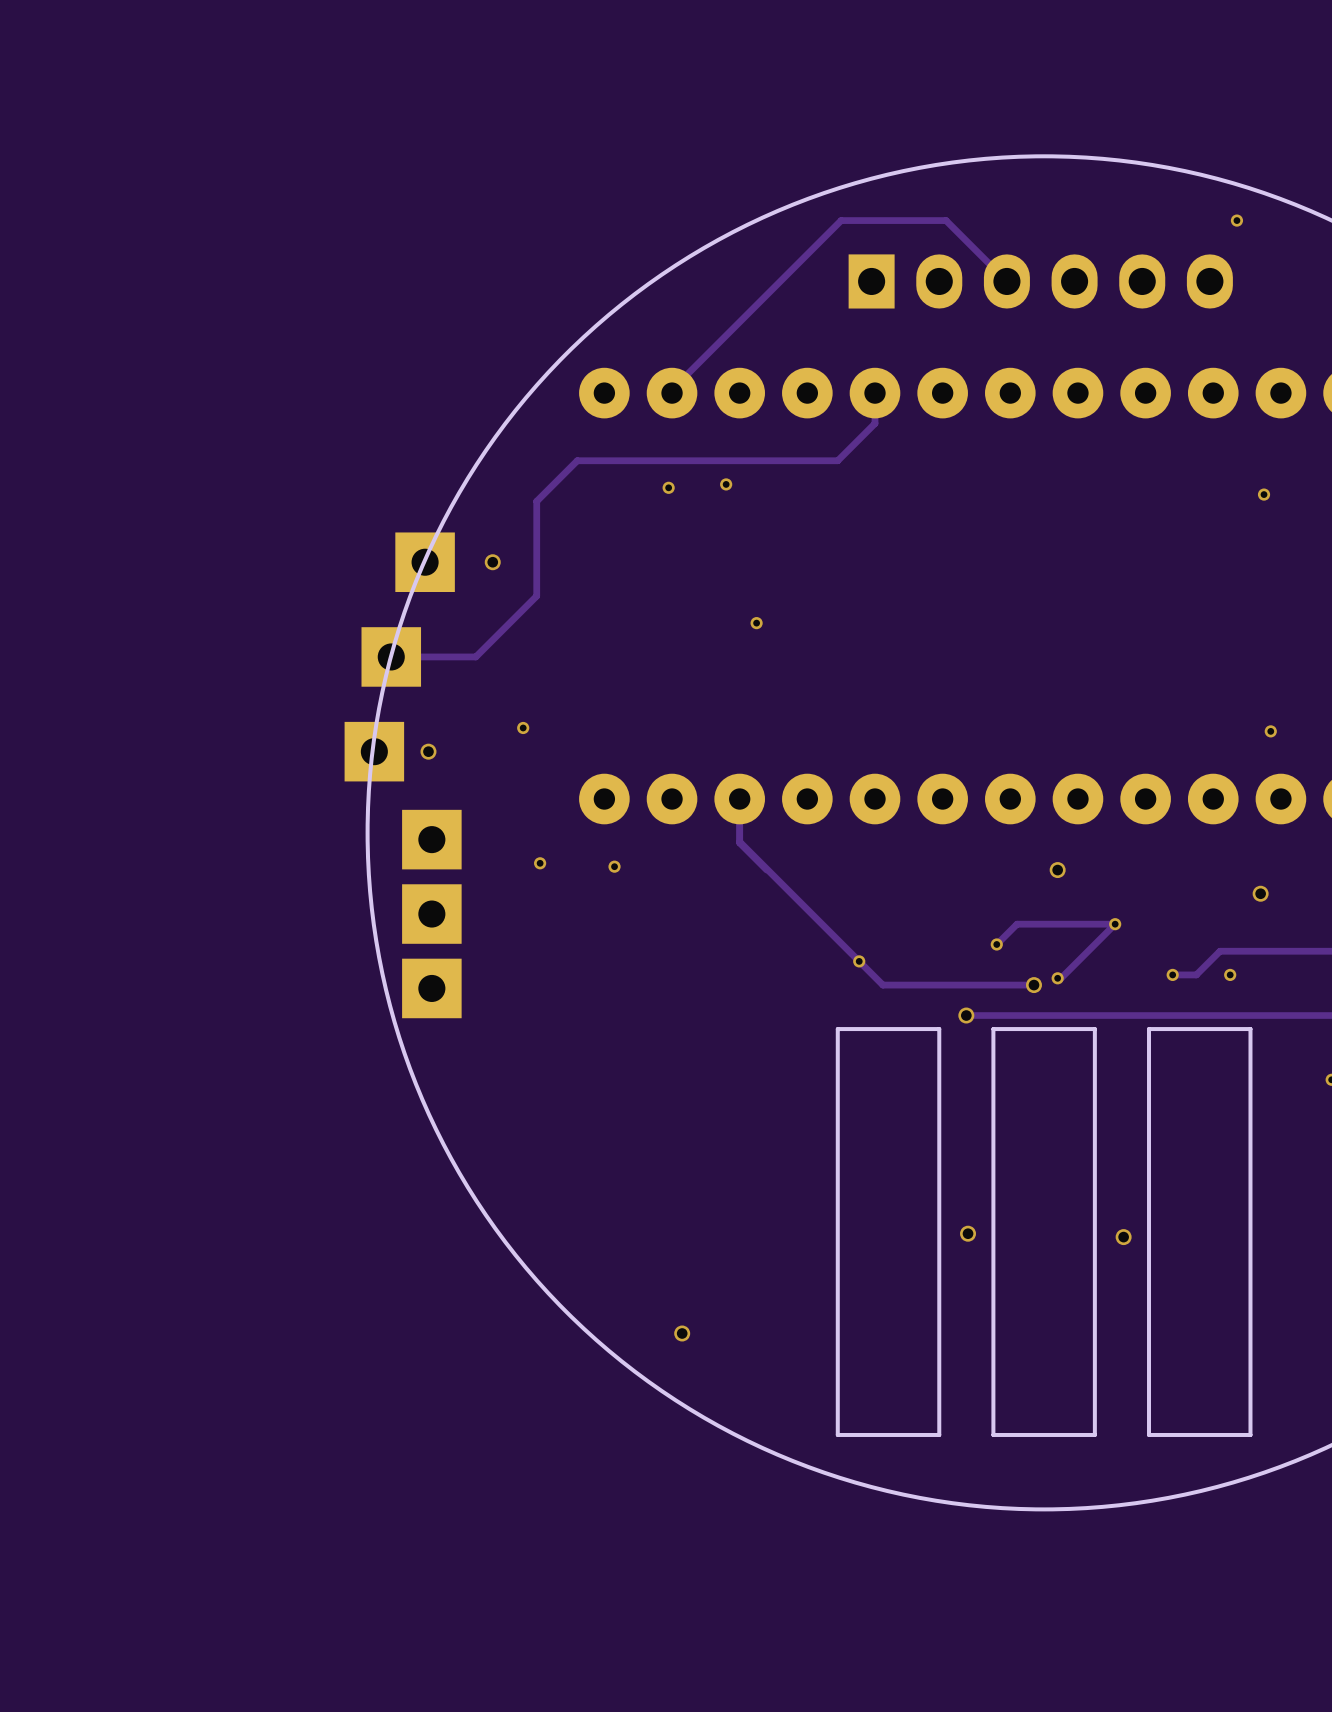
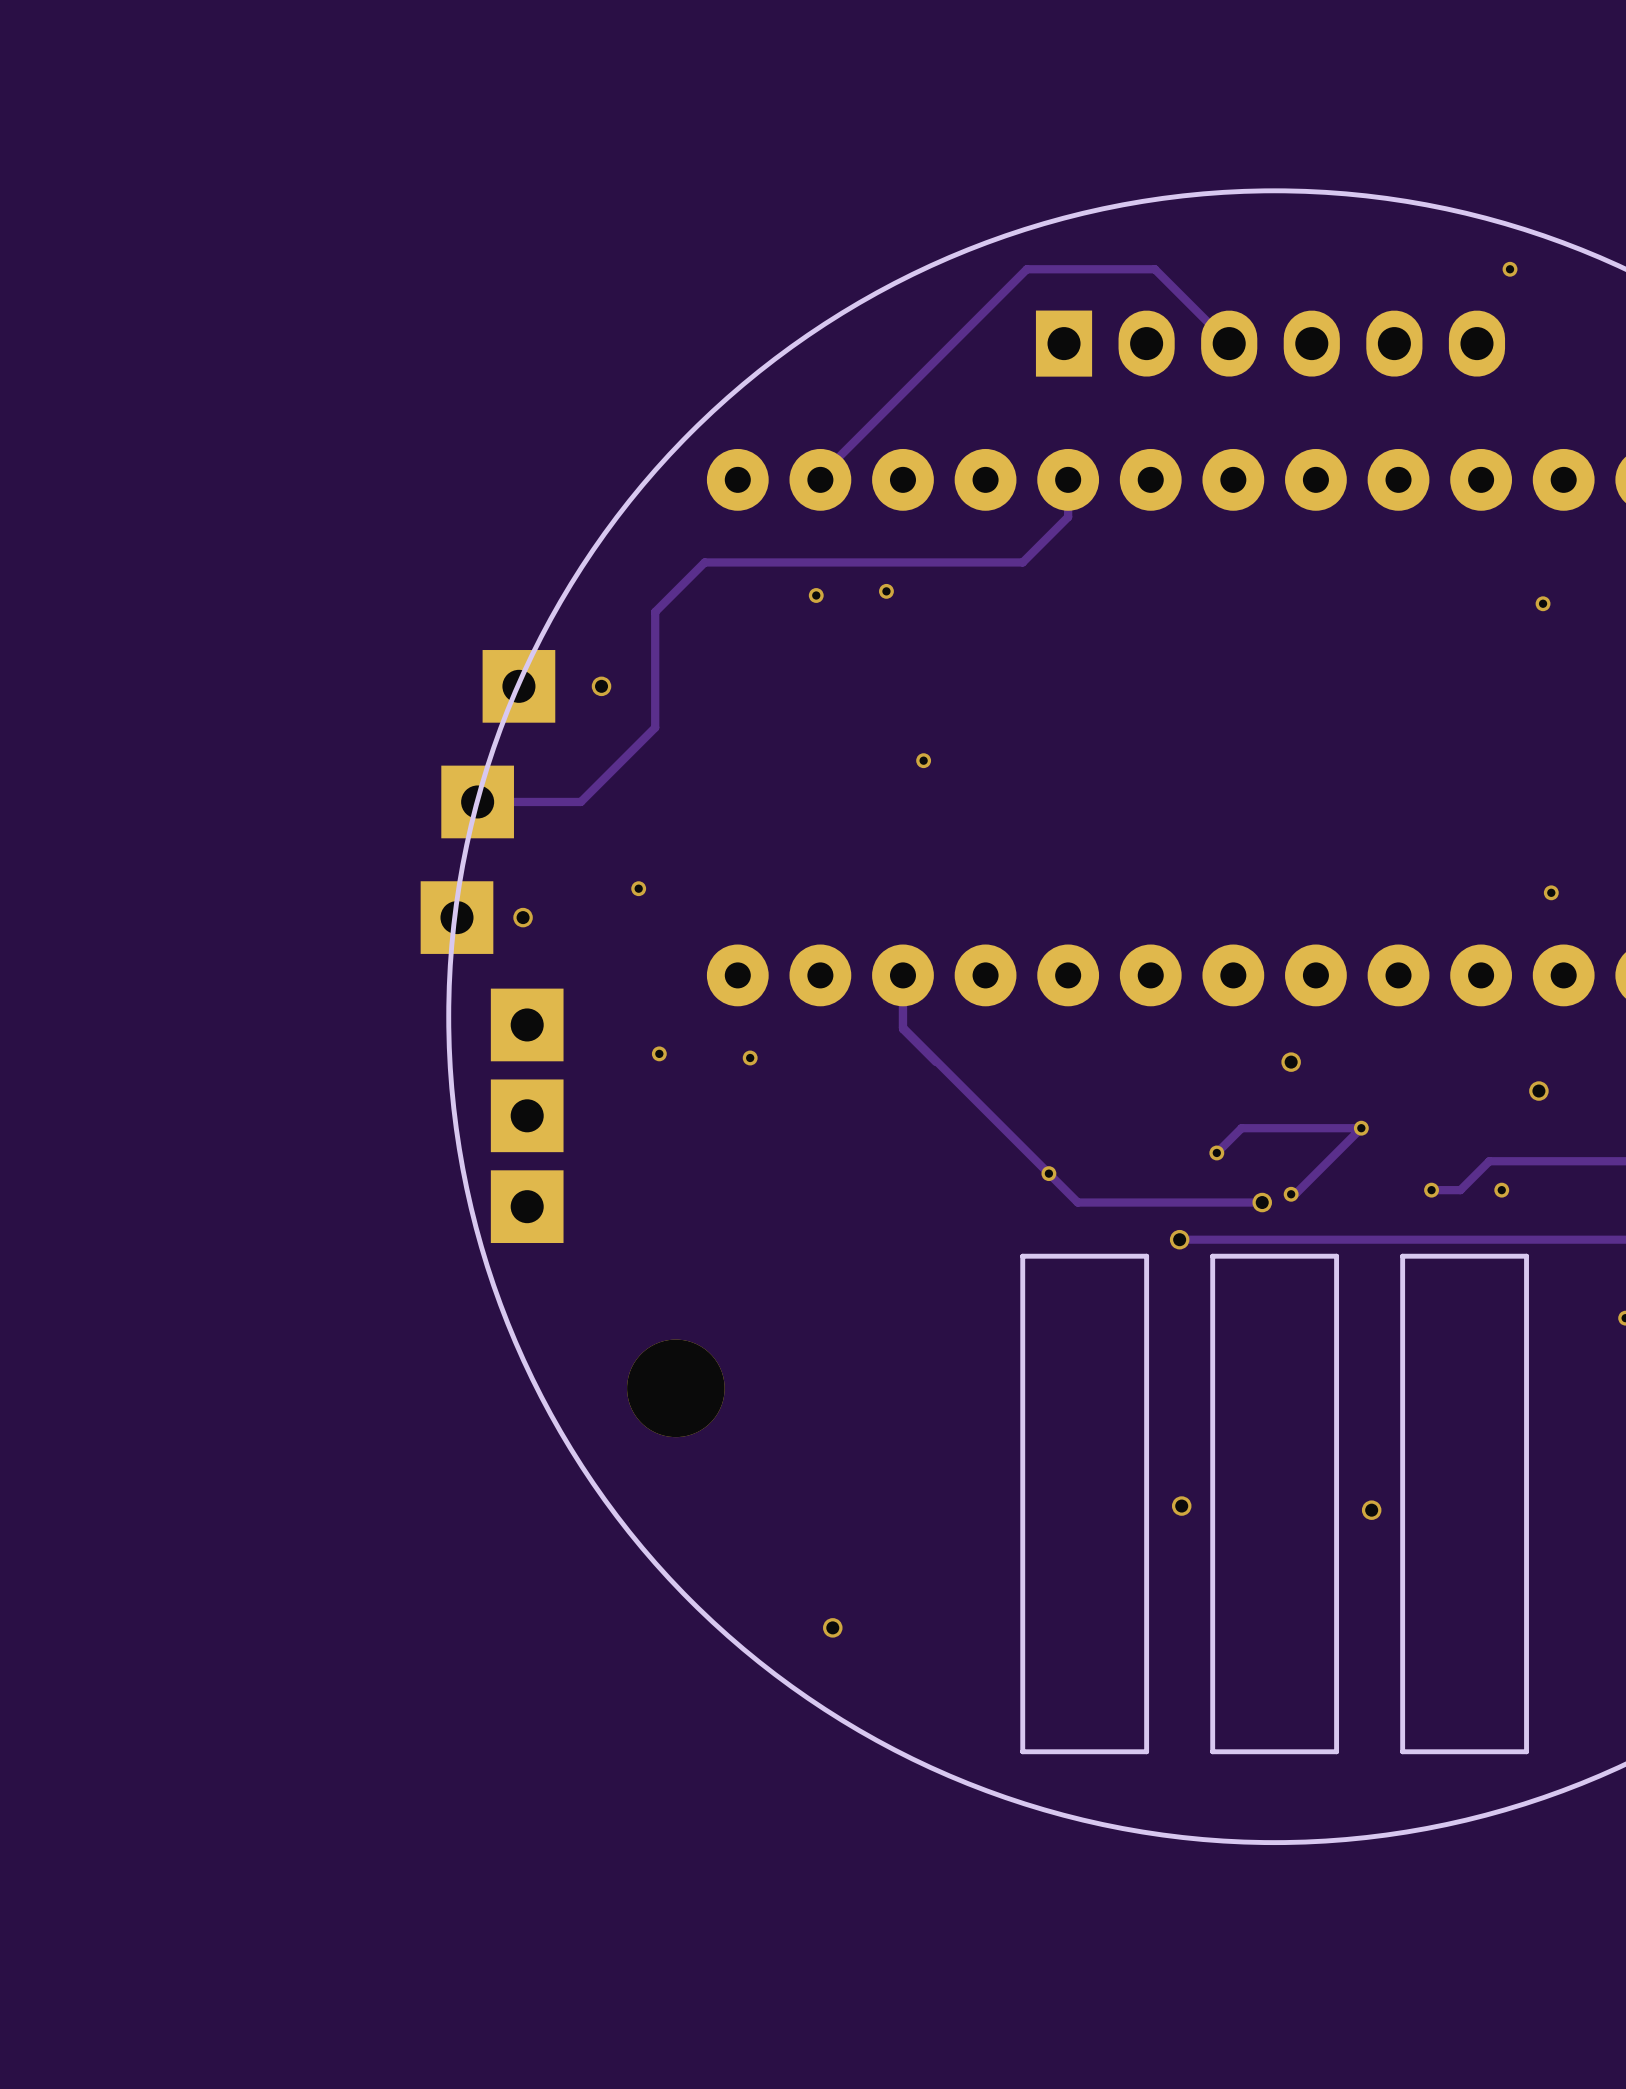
part: none -> (675, 1388)

